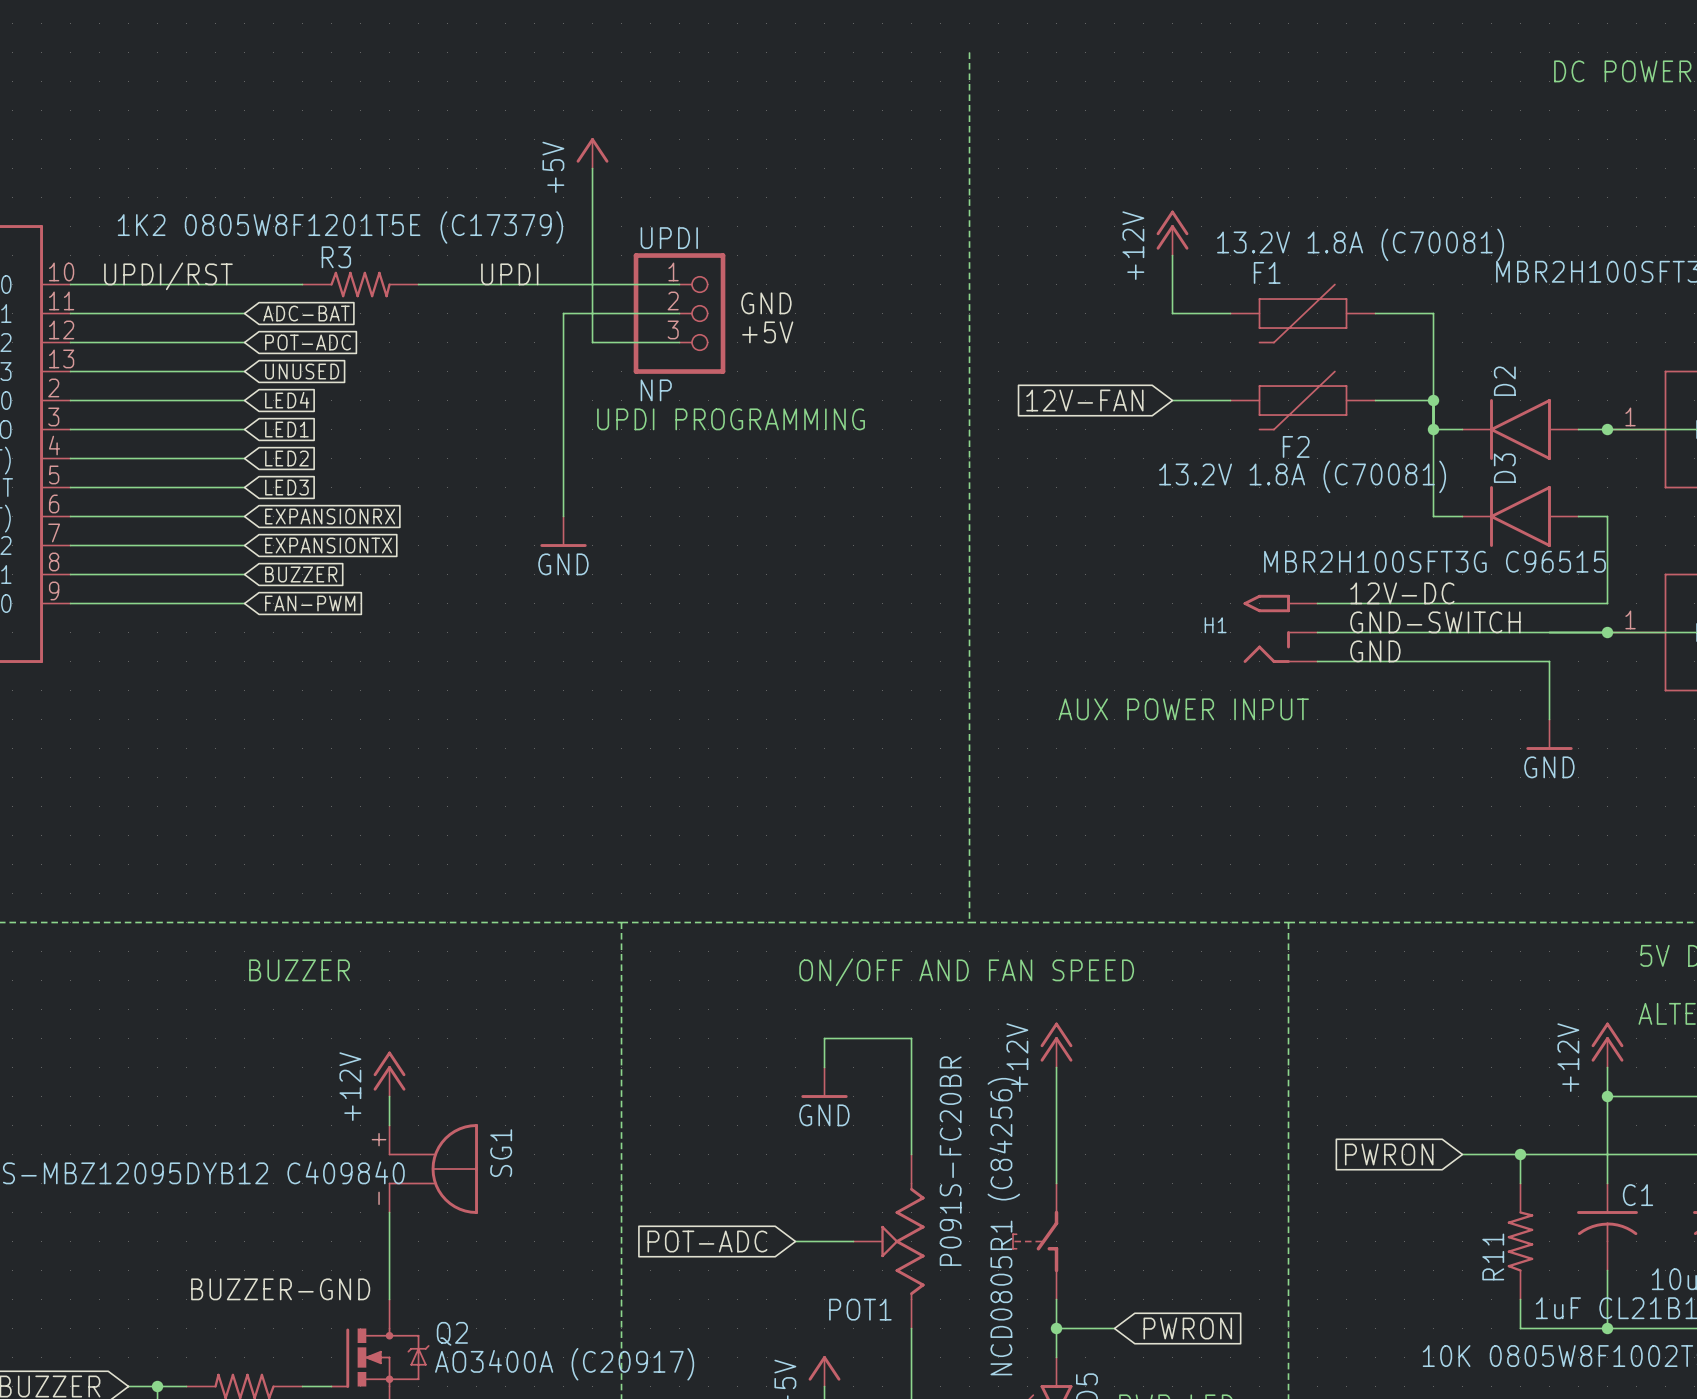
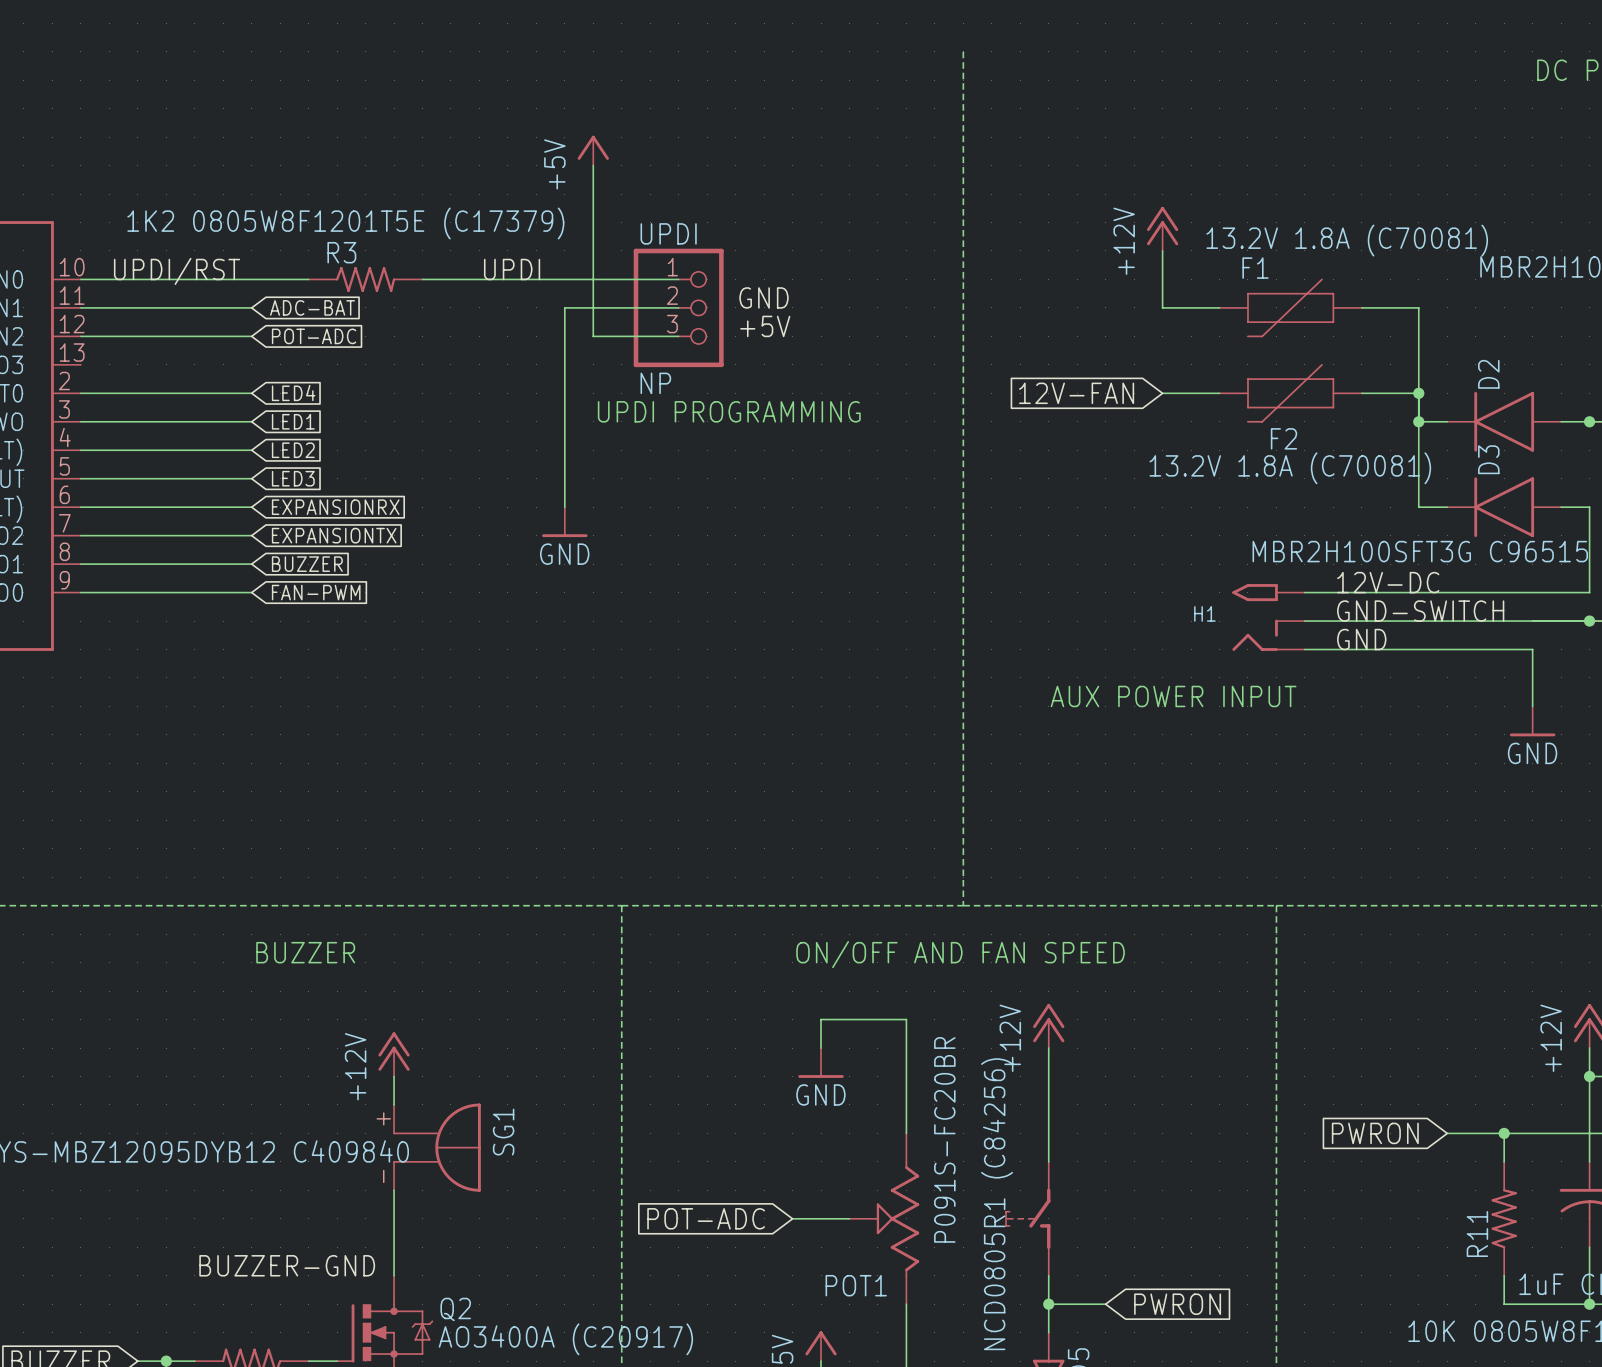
wire: (70, 371) (244, 371) -> none
global label: UNUSED (302, 371) -> none

